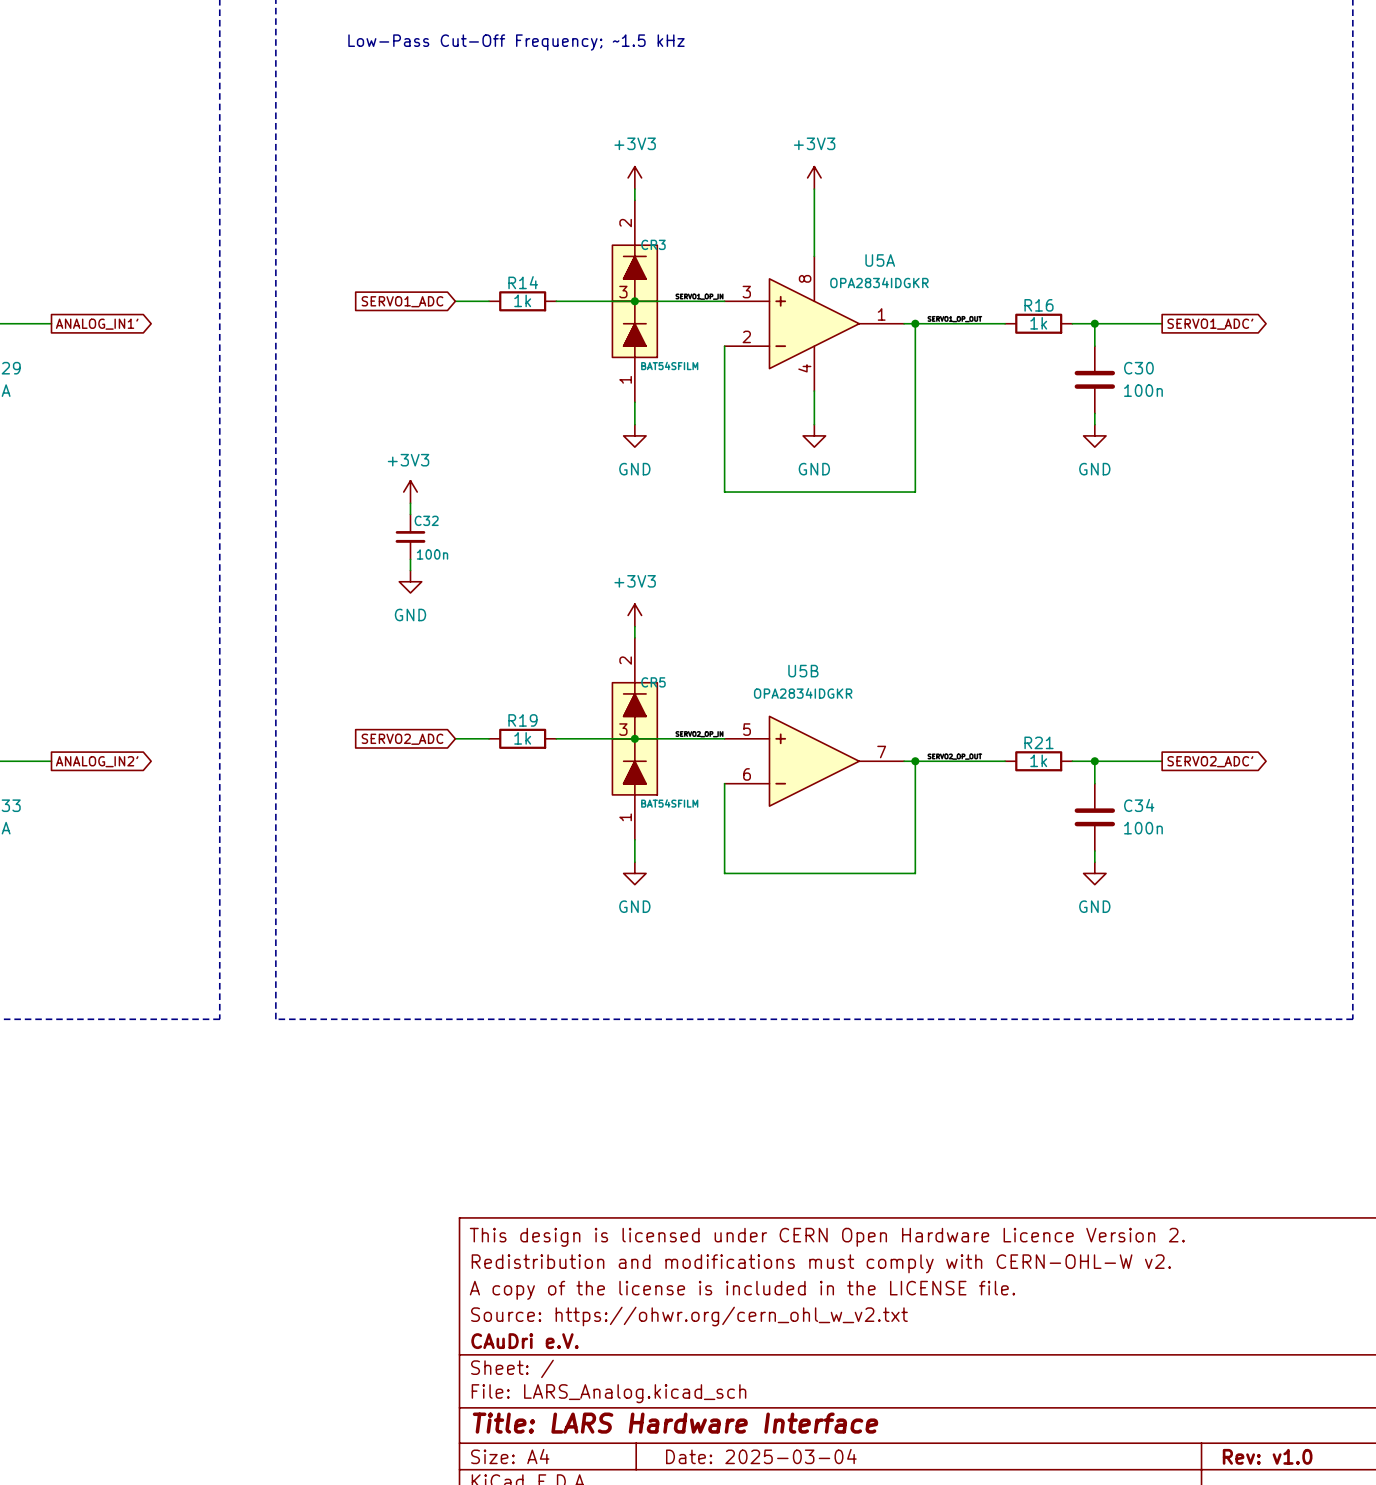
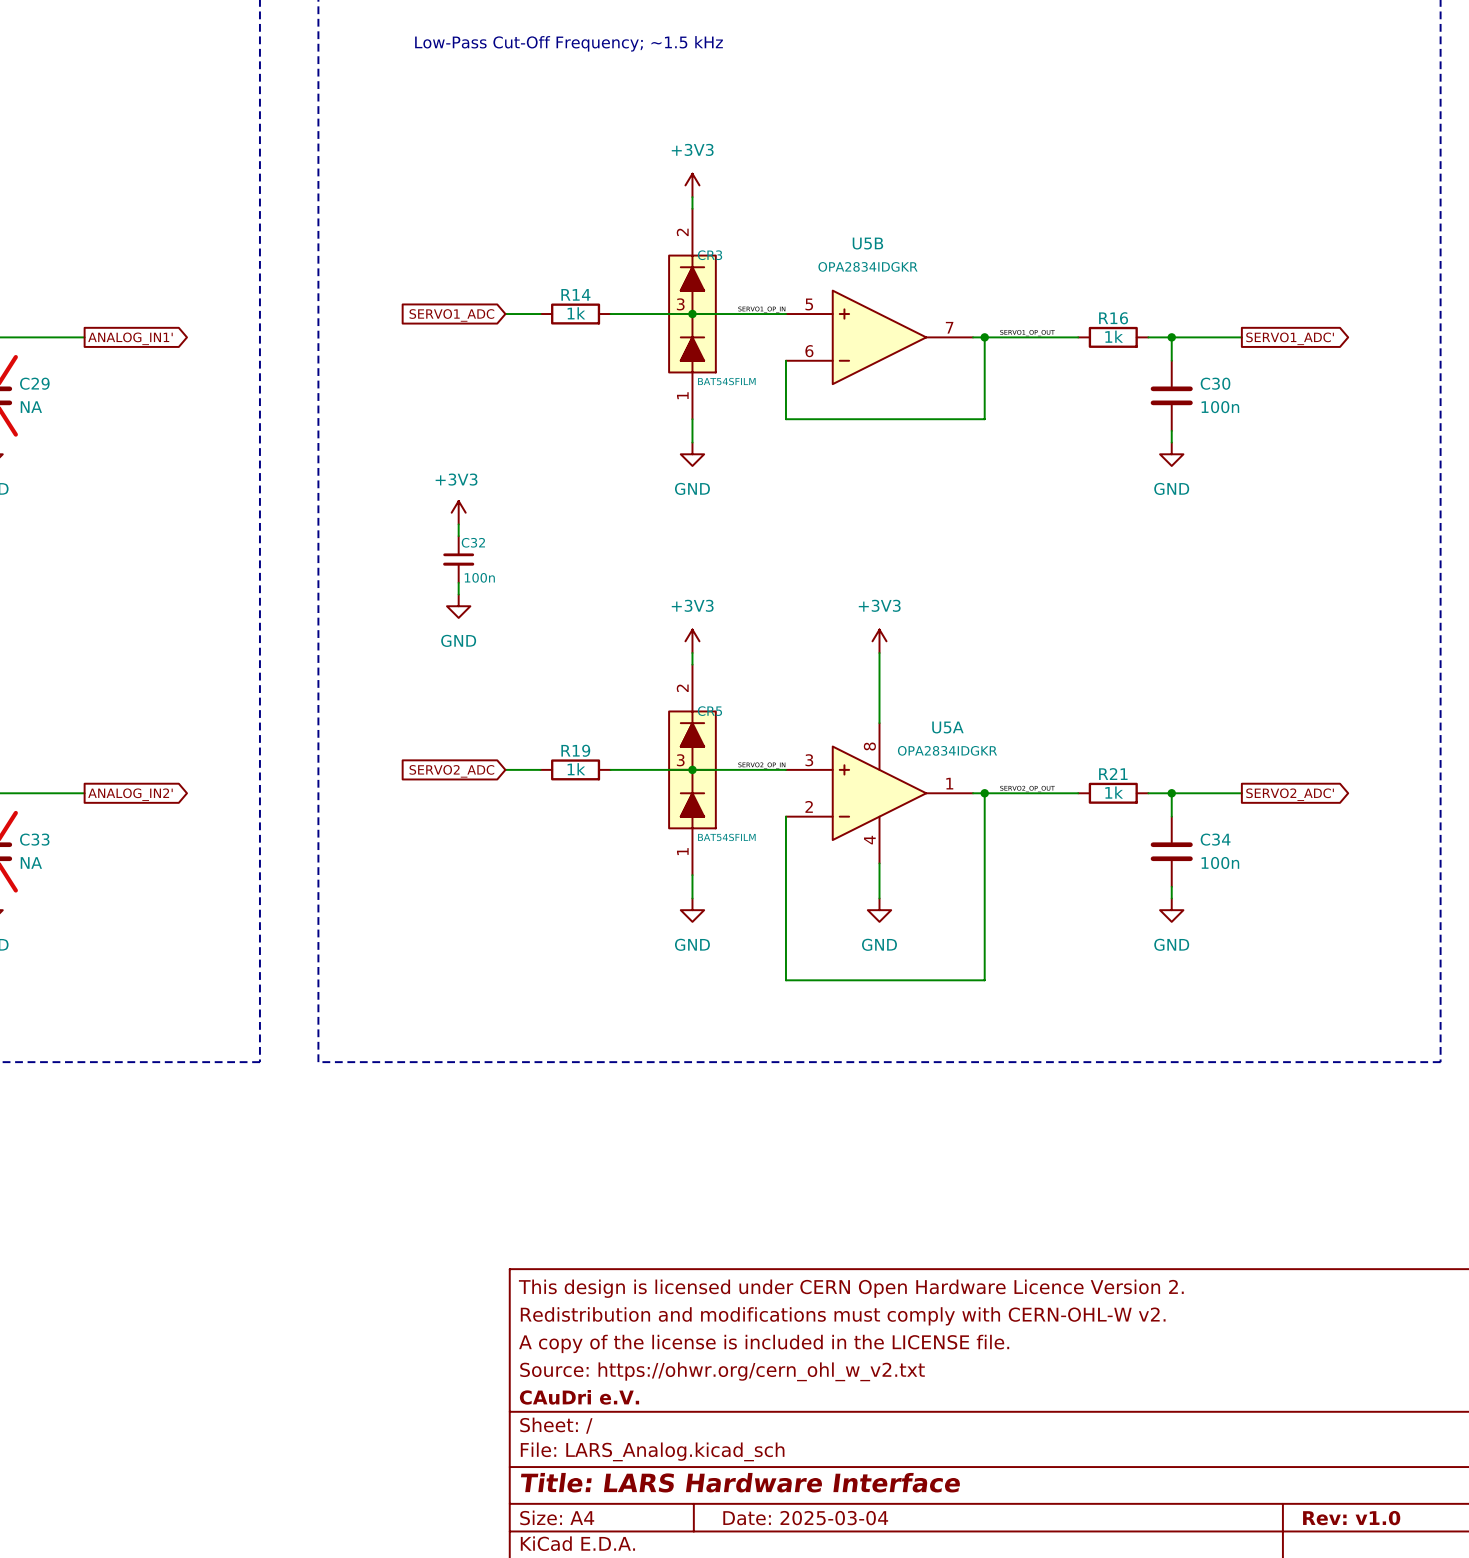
power symbol: +3V3 (814, 177) -> none
wire: (814, 189) (814, 256) -> none
U5A position: (814, 323) -> (879, 793)
wire: (814, 391) (814, 424) -> none
wire: (724, 402) (724, 492) (915, 492) (915, 402) -> (785, 419) (984, 419)
power symbol: GND (814, 435) -> none
power symbol: none -> +3V3 (879, 641)
wire: none -> (879, 653) (879, 723)
U5B position: (814, 761) -> (879, 337)
wire: none -> (879, 863) (879, 898)
wire: (724, 873) (915, 873) -> (785, 910) (785, 980) (984, 980) (984, 910)
power symbol: none -> GND (879, 910)

